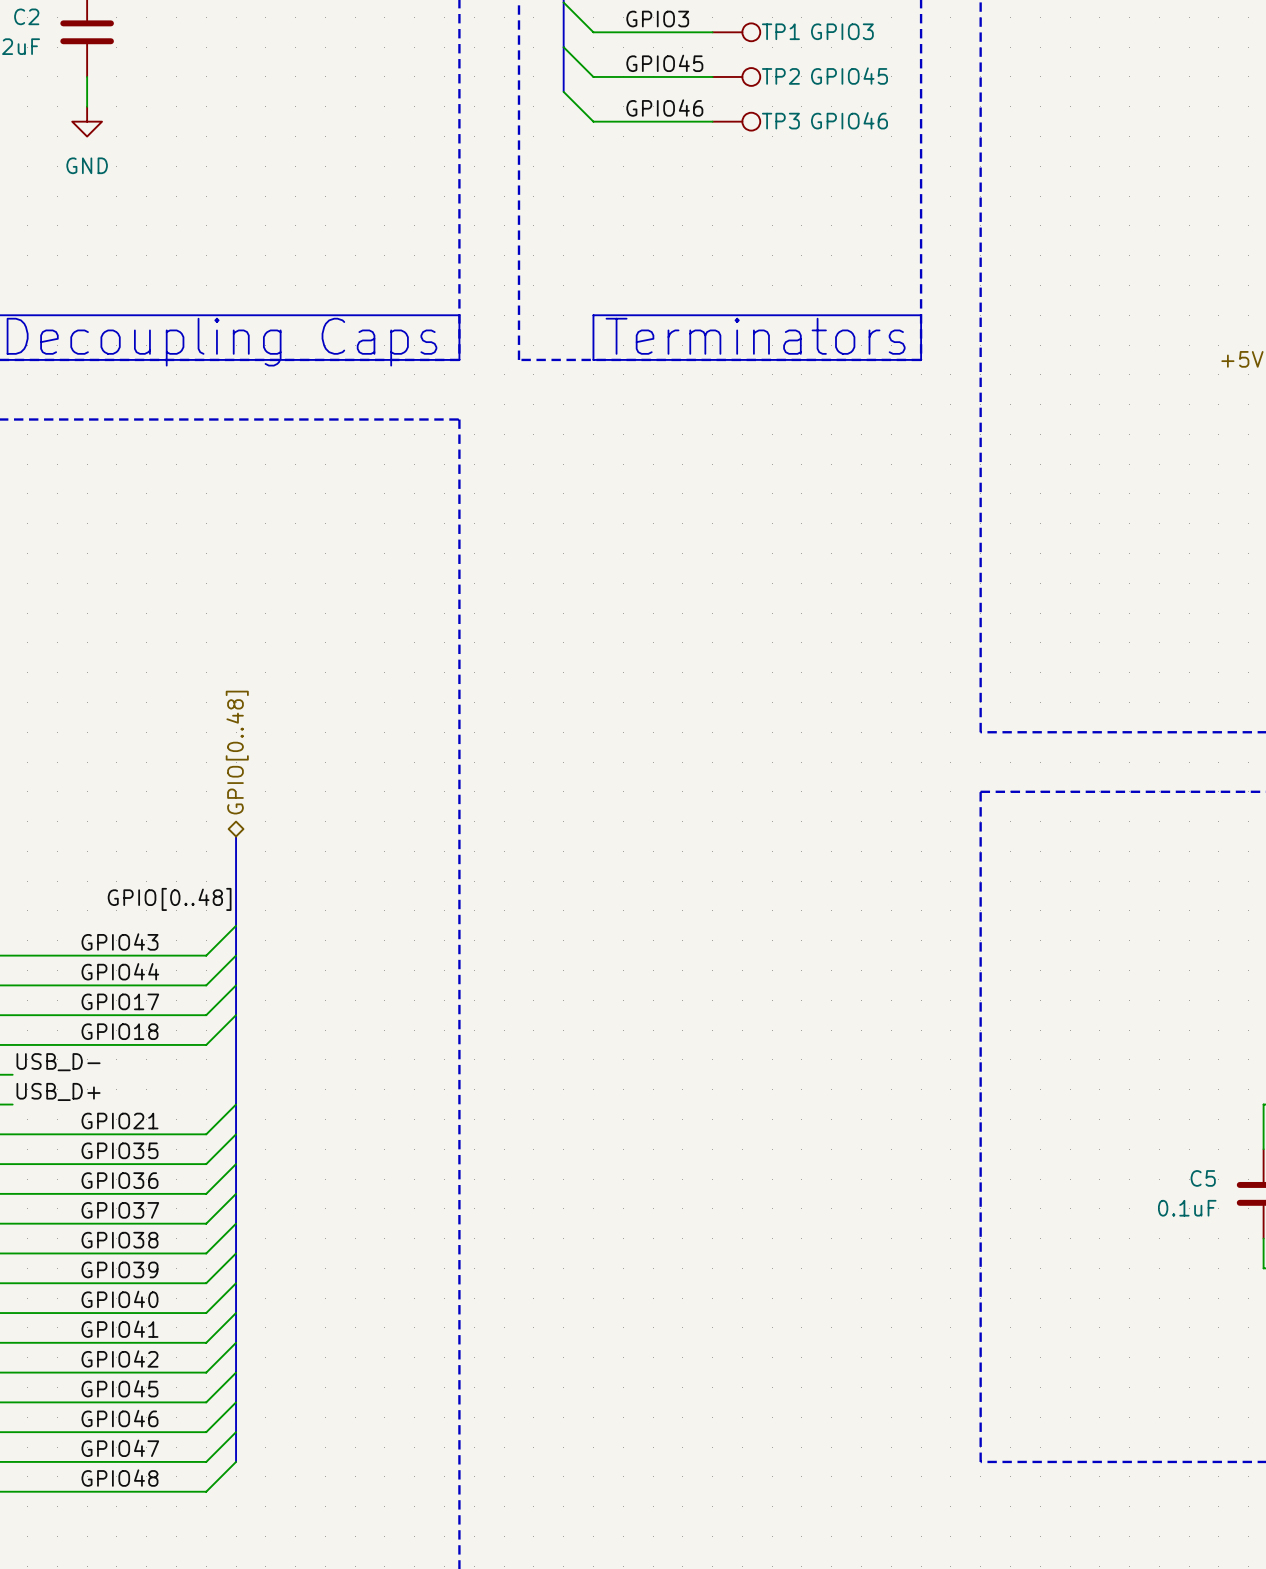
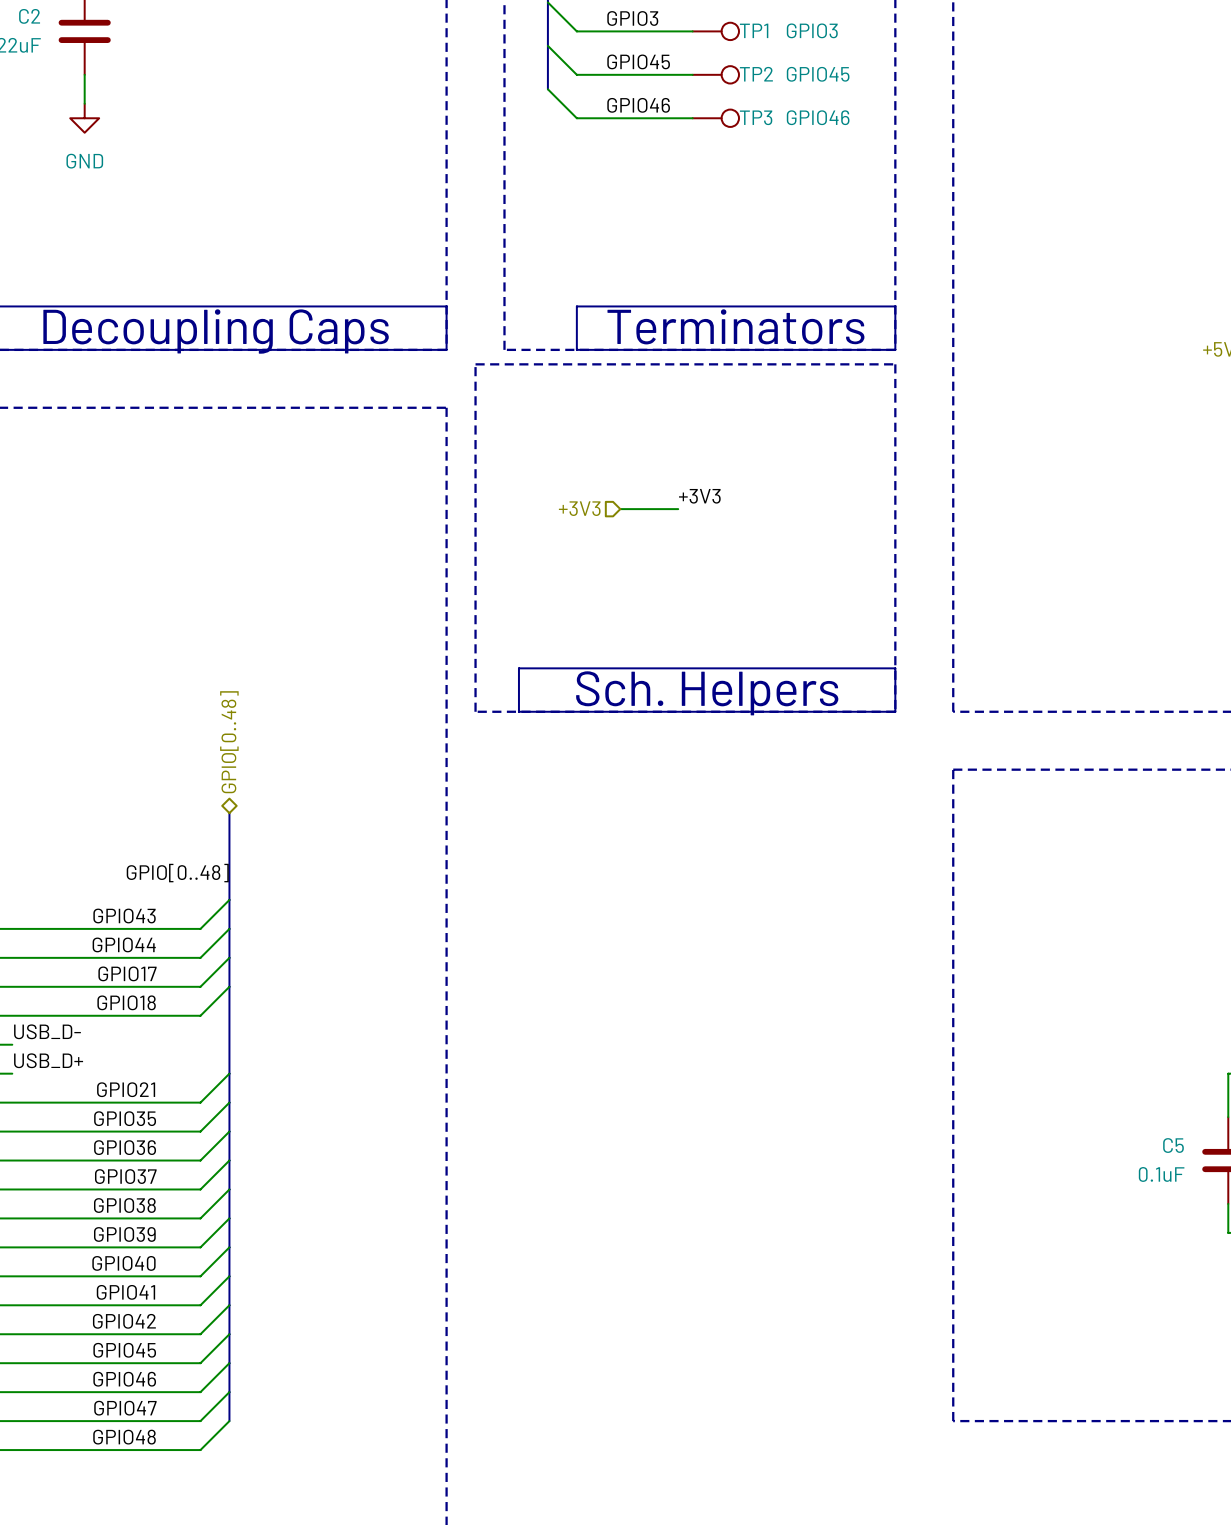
label: none -> +3V3 (699, 496)
hierarchical label: none -> +3V3 (579, 508)
wire: none -> (620, 509) (678, 509)
text: none -> Sch. Helpers (707, 693)
line: none -> (895, 711) (895, 364) (475, 364) (475, 711) (895, 711)
line: none -> (895, 711) (895, 668) (518, 668) (518, 711) (895, 711)

